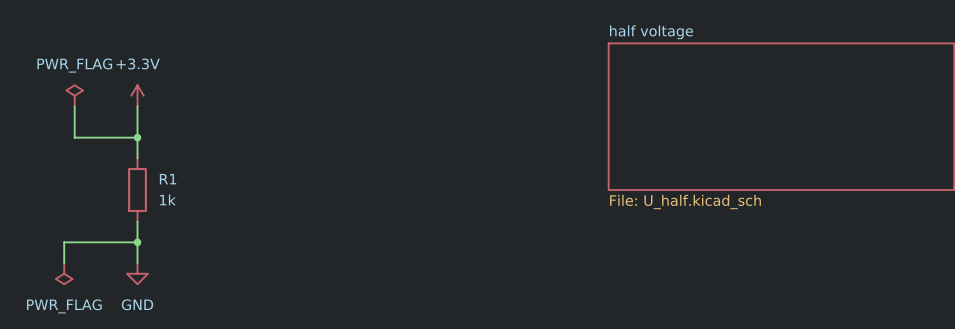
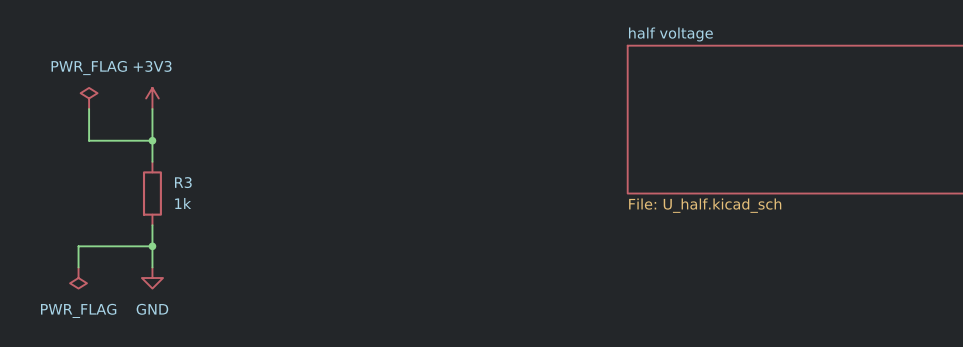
power symbol: +3.3V (137, 95) -> +3V3 (152, 98)
R1 name: R1 (168, 179) -> R3 (183, 182)

